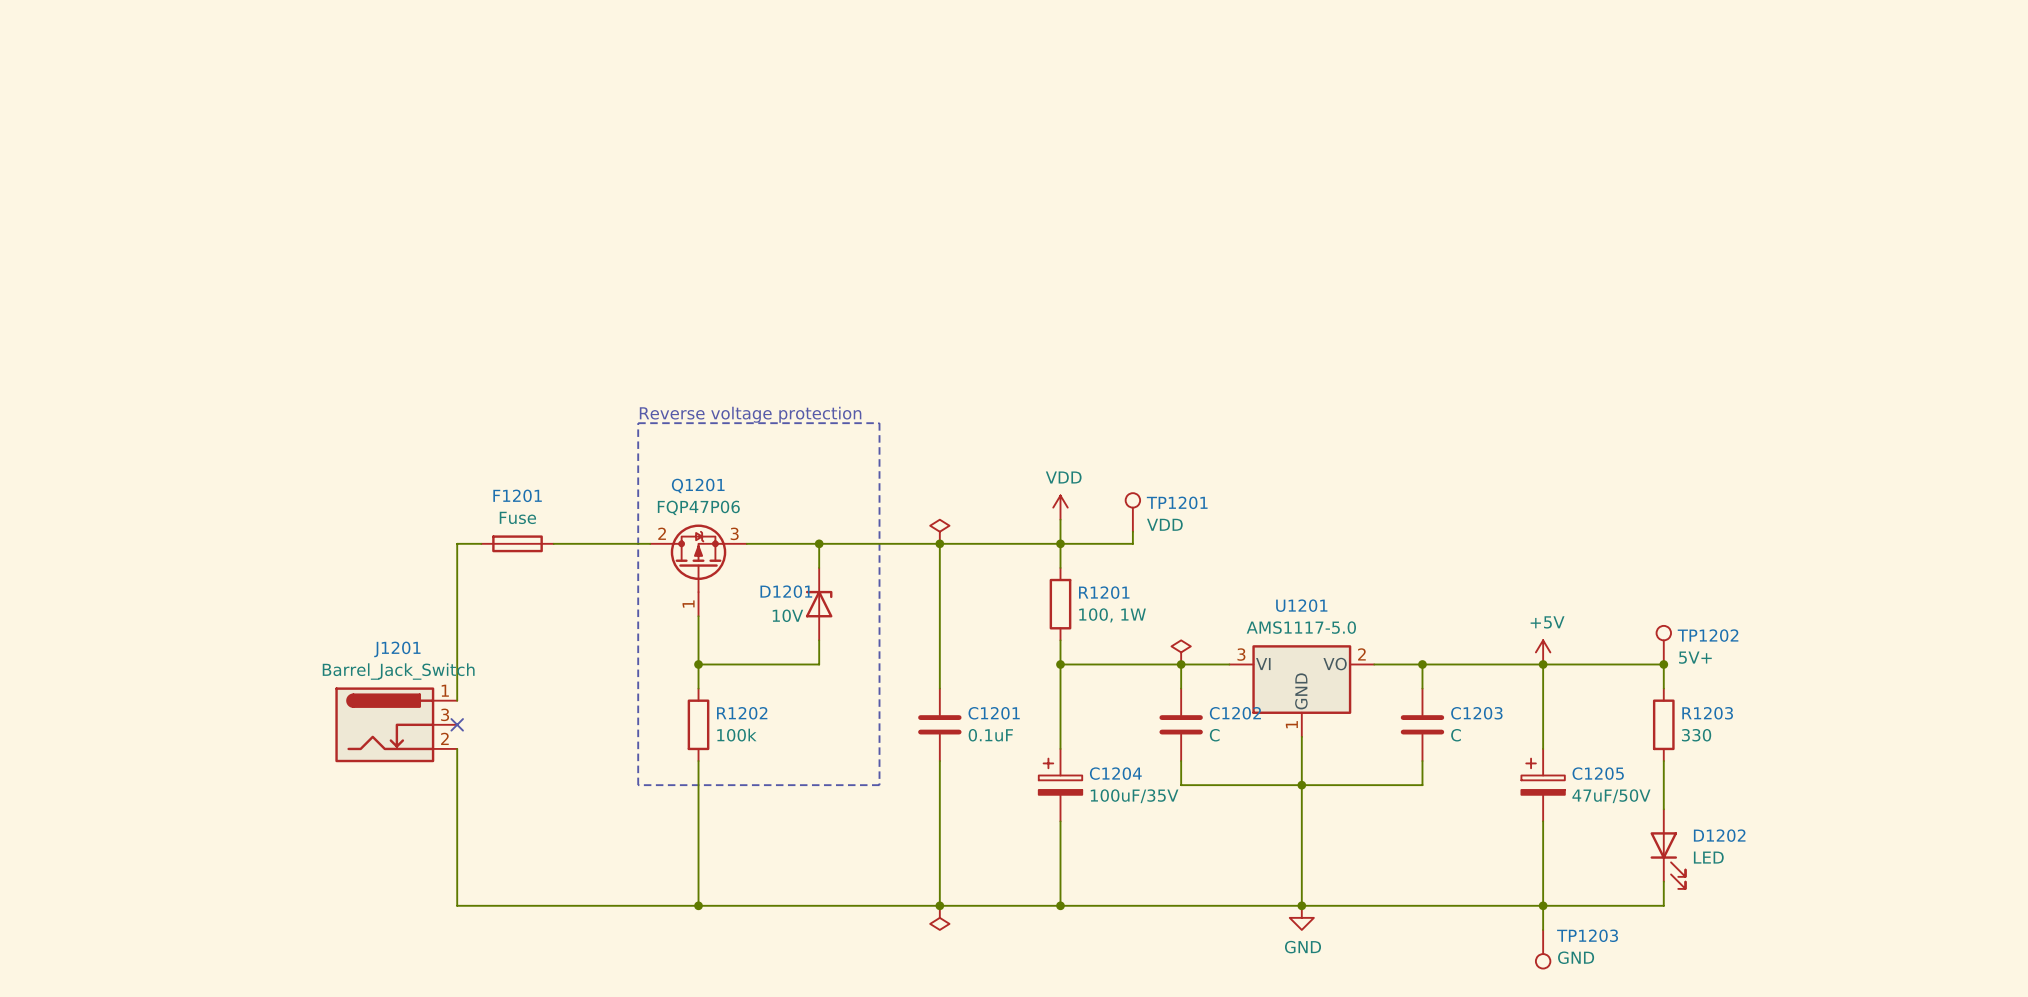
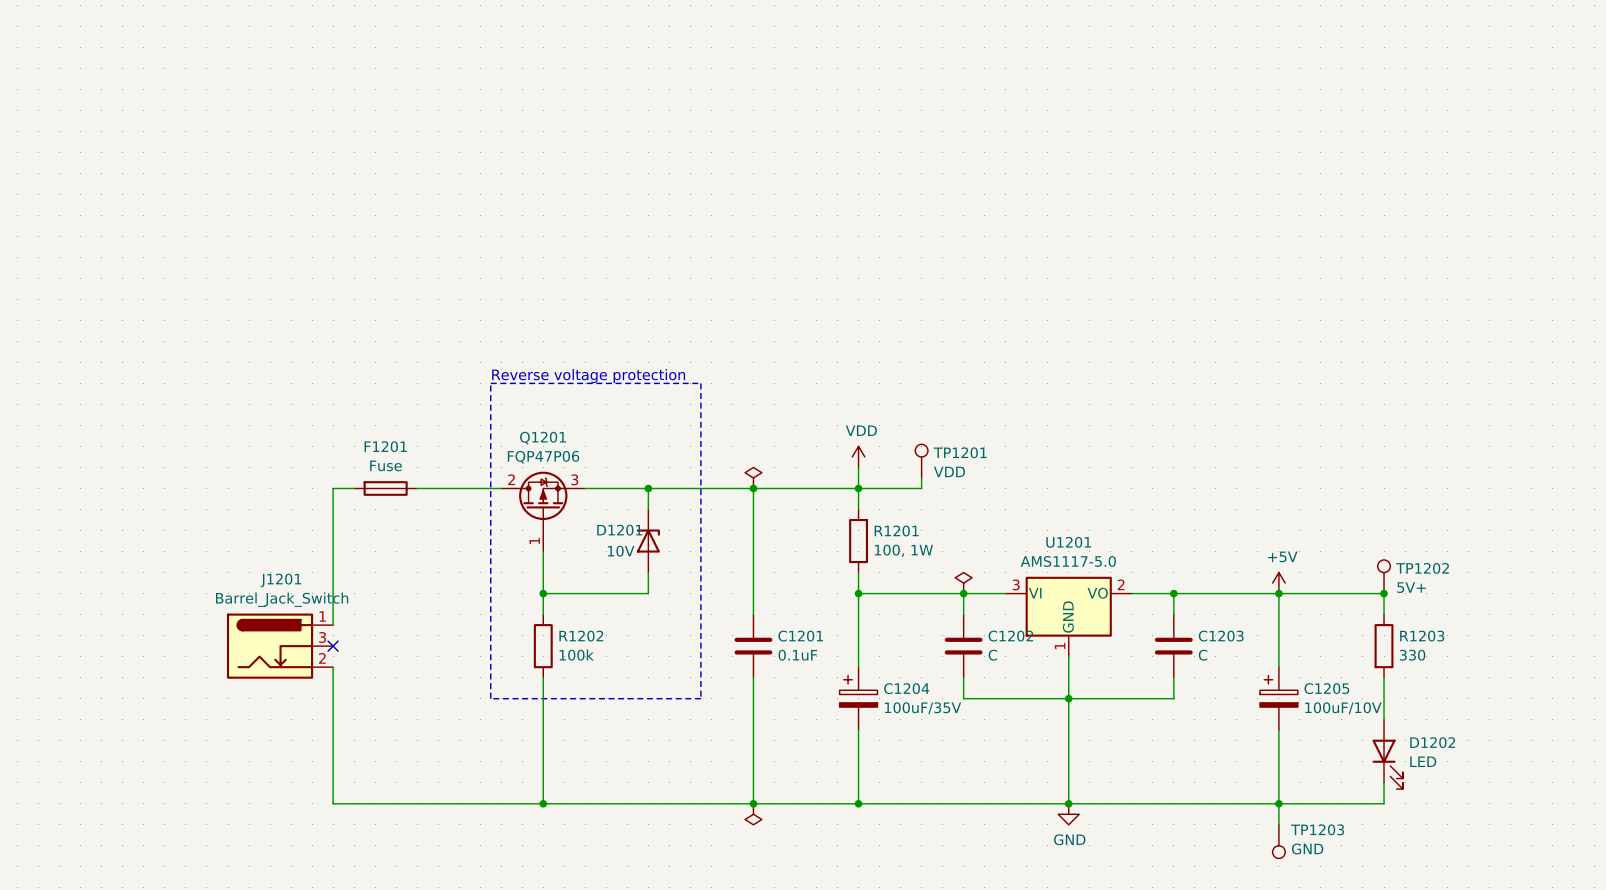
C1205 value: 47uF/50V (1611, 796) -> 100uF/10V (1343, 708)

